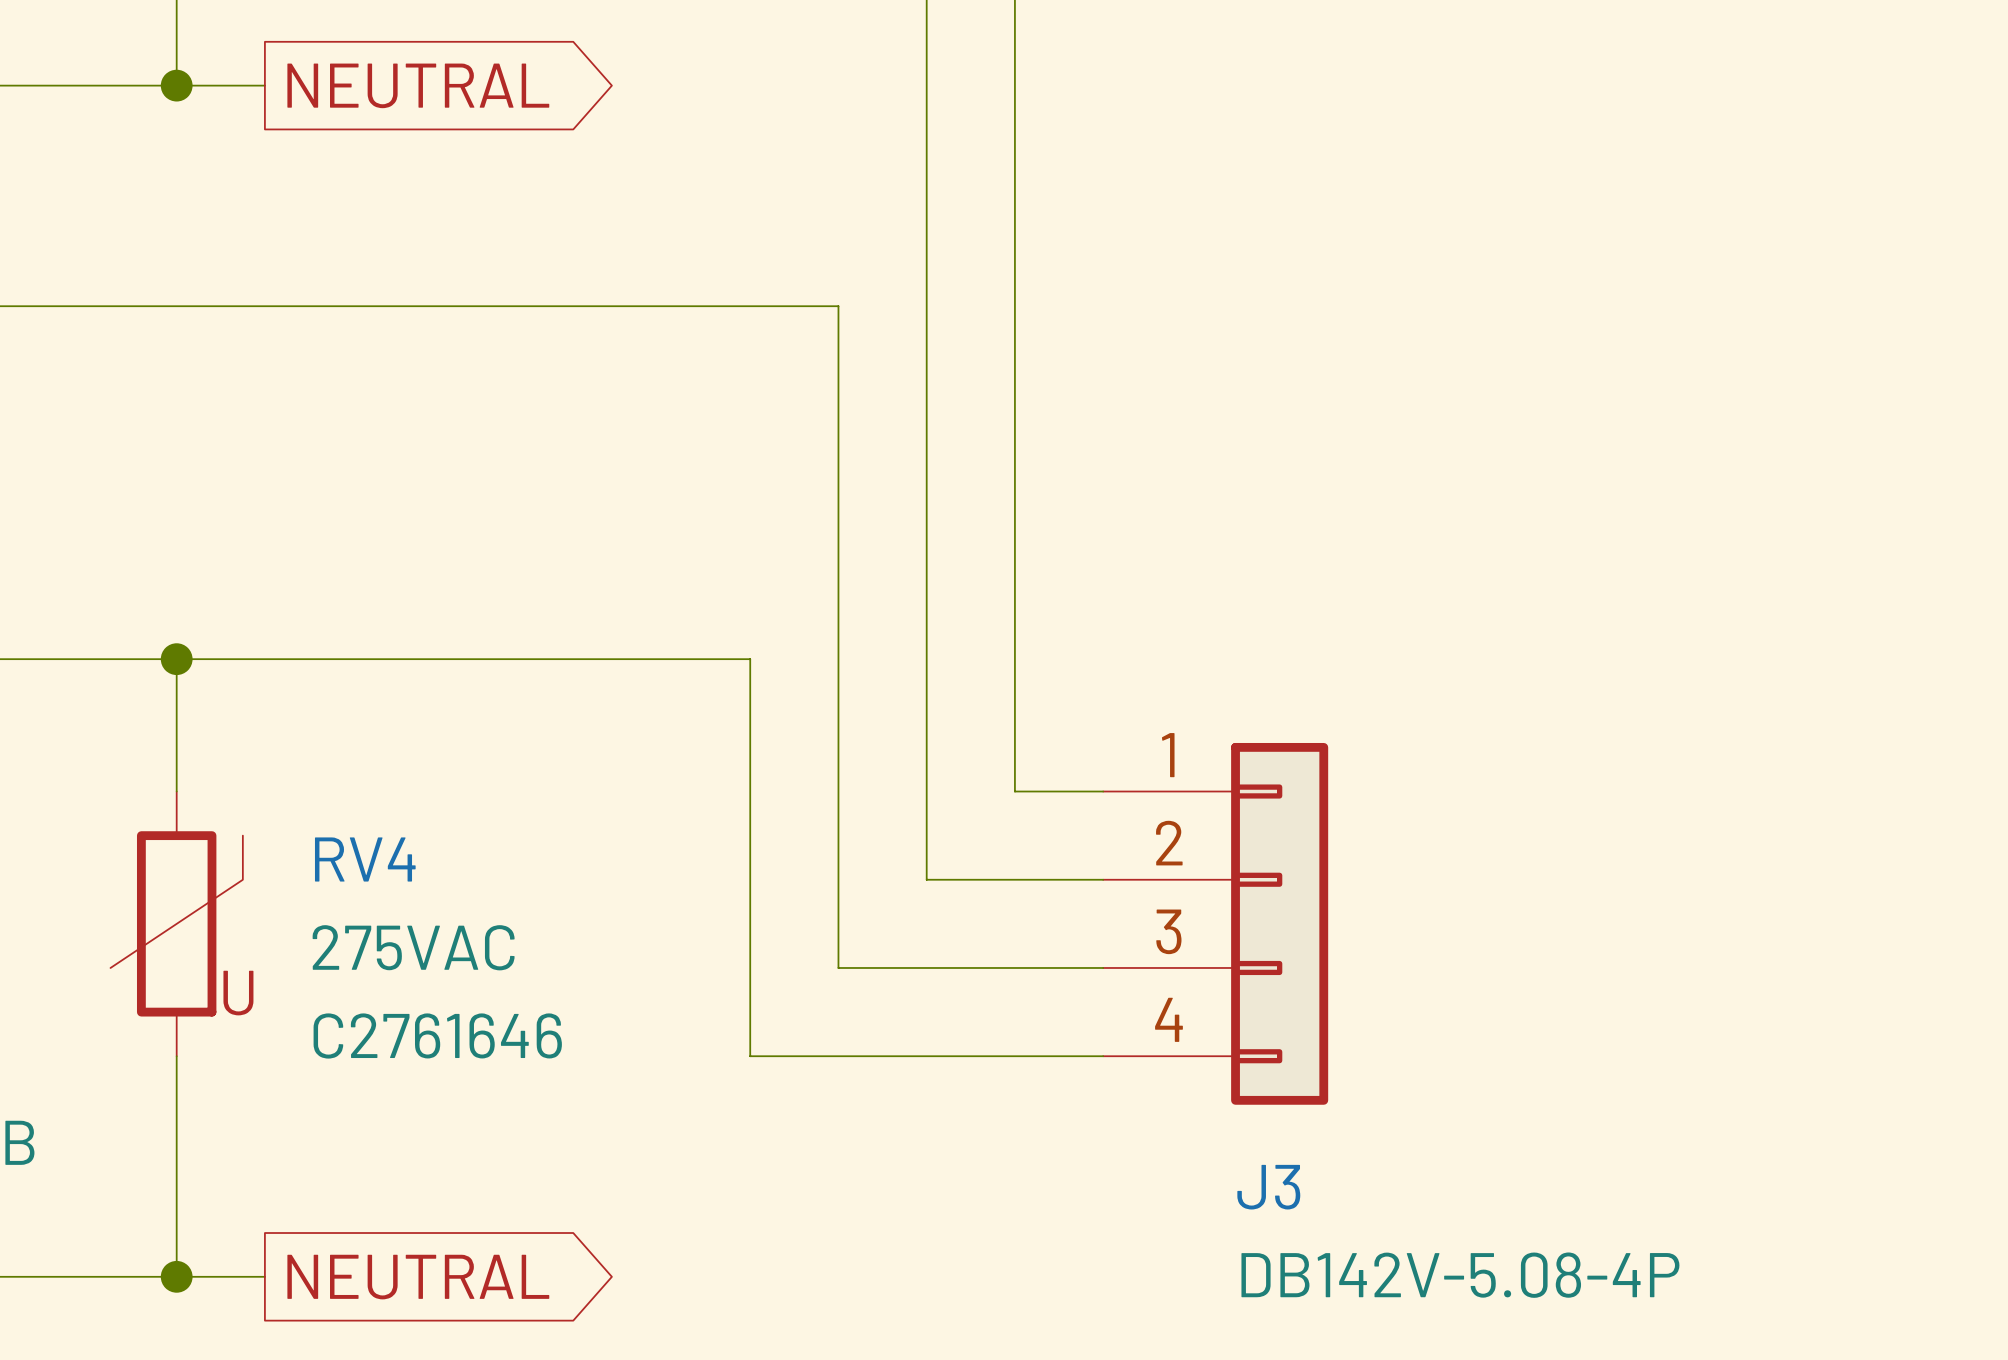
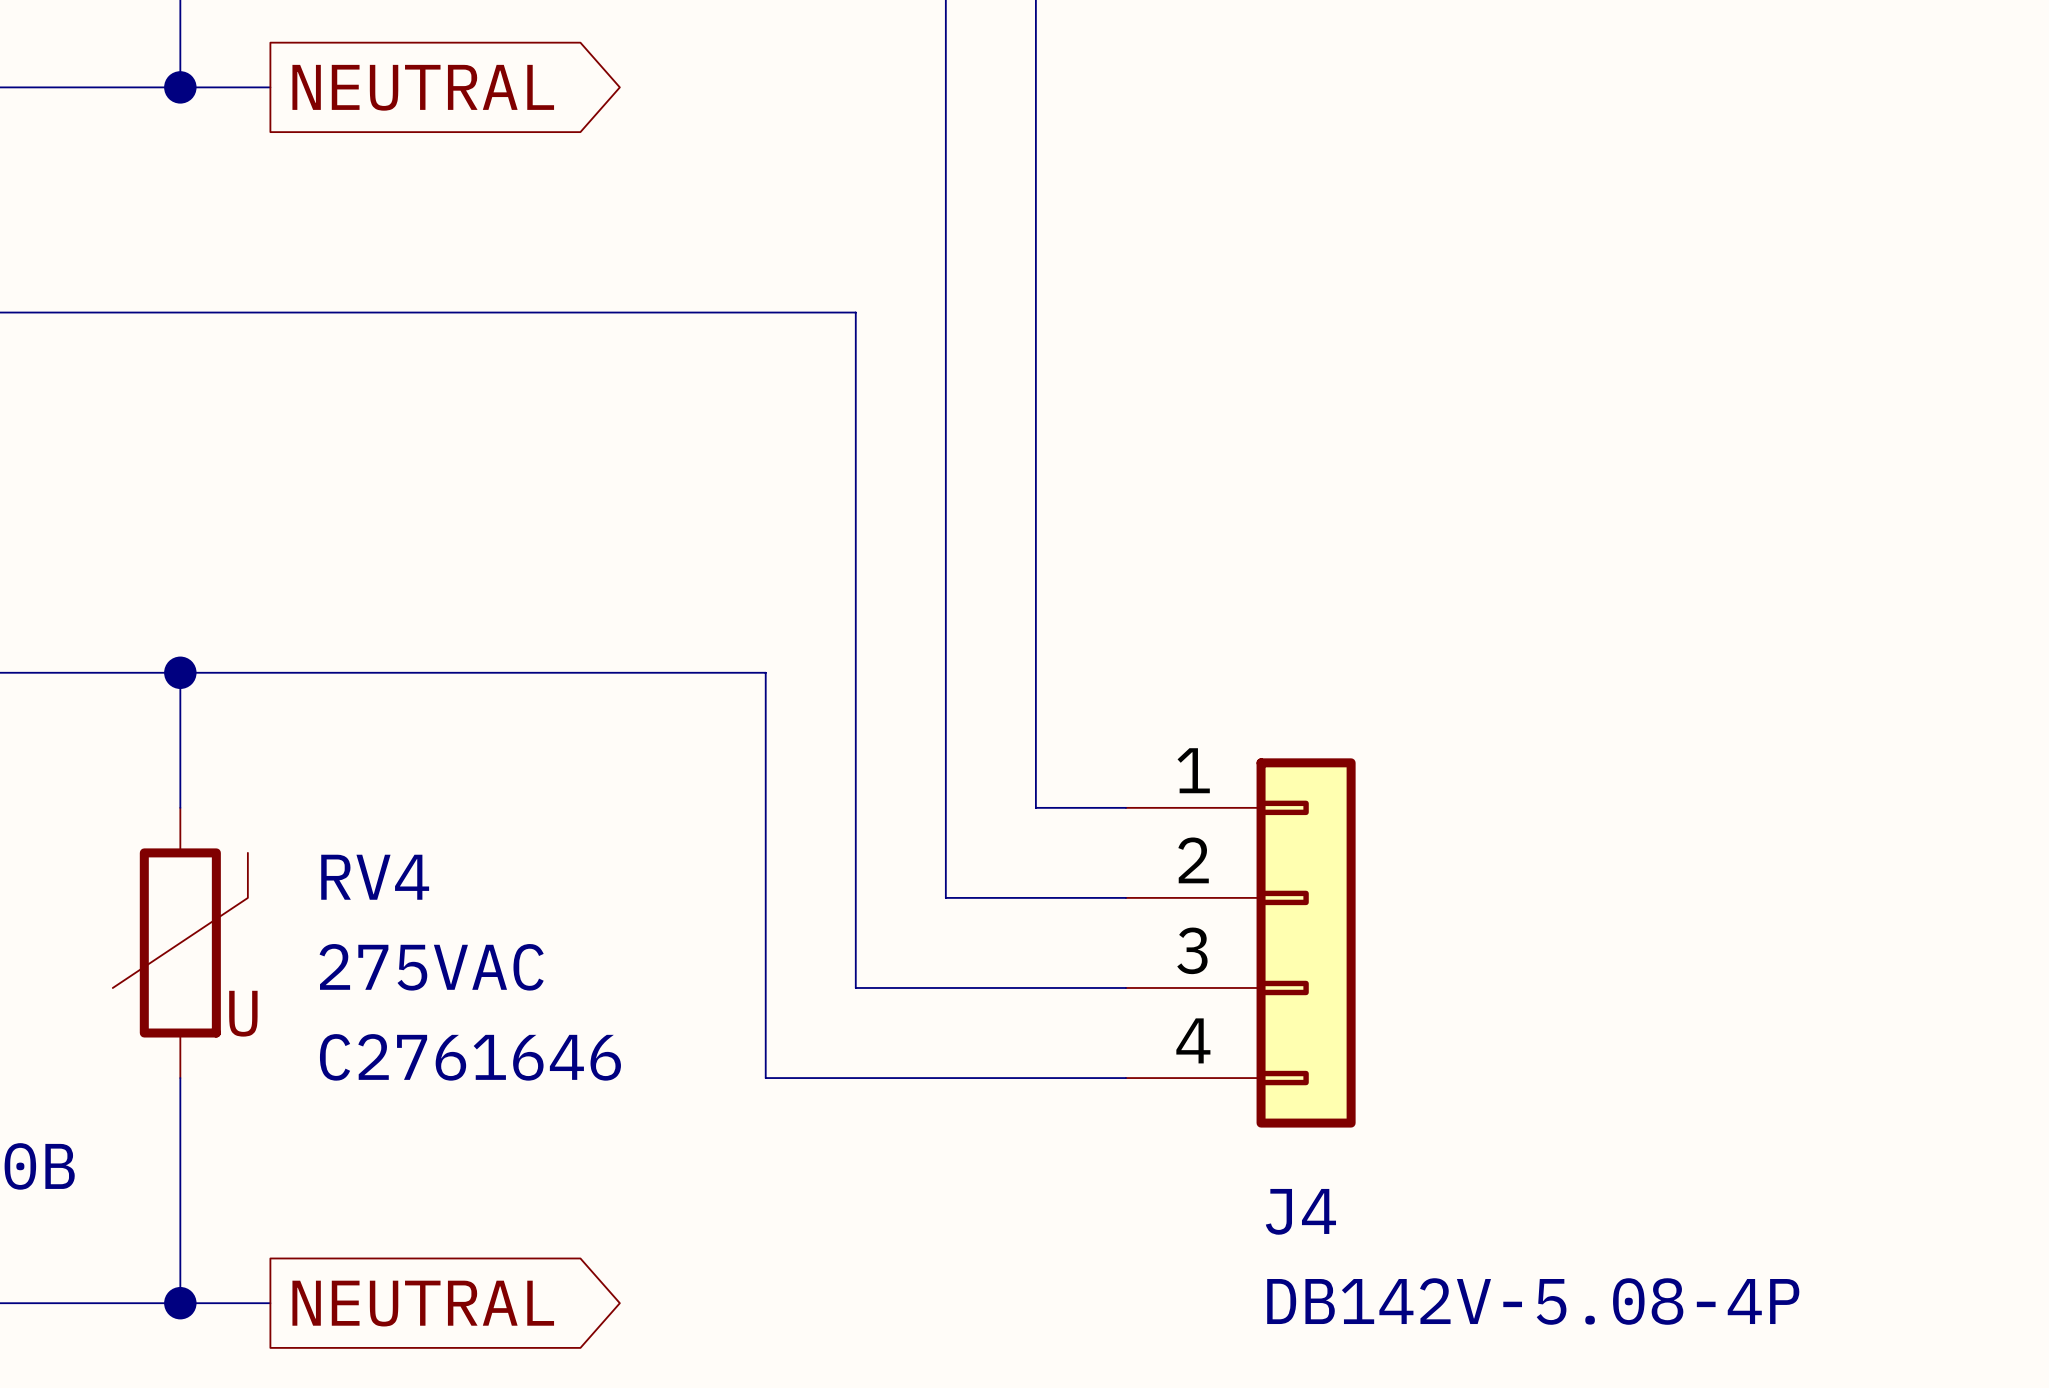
J3 name: J3 (1268, 1187) -> J4 (1300, 1211)

